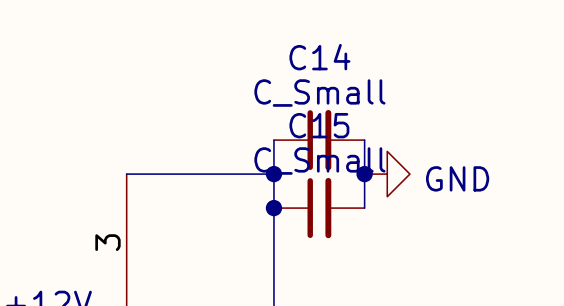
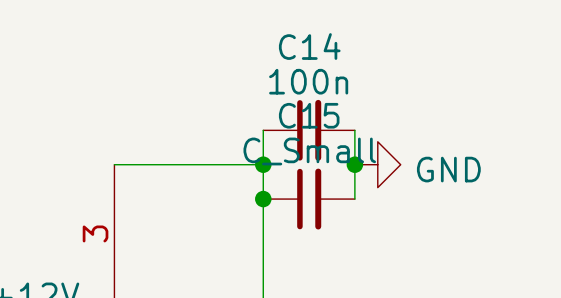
C14 value: C_Small (319, 93) -> 100n (308, 81)

